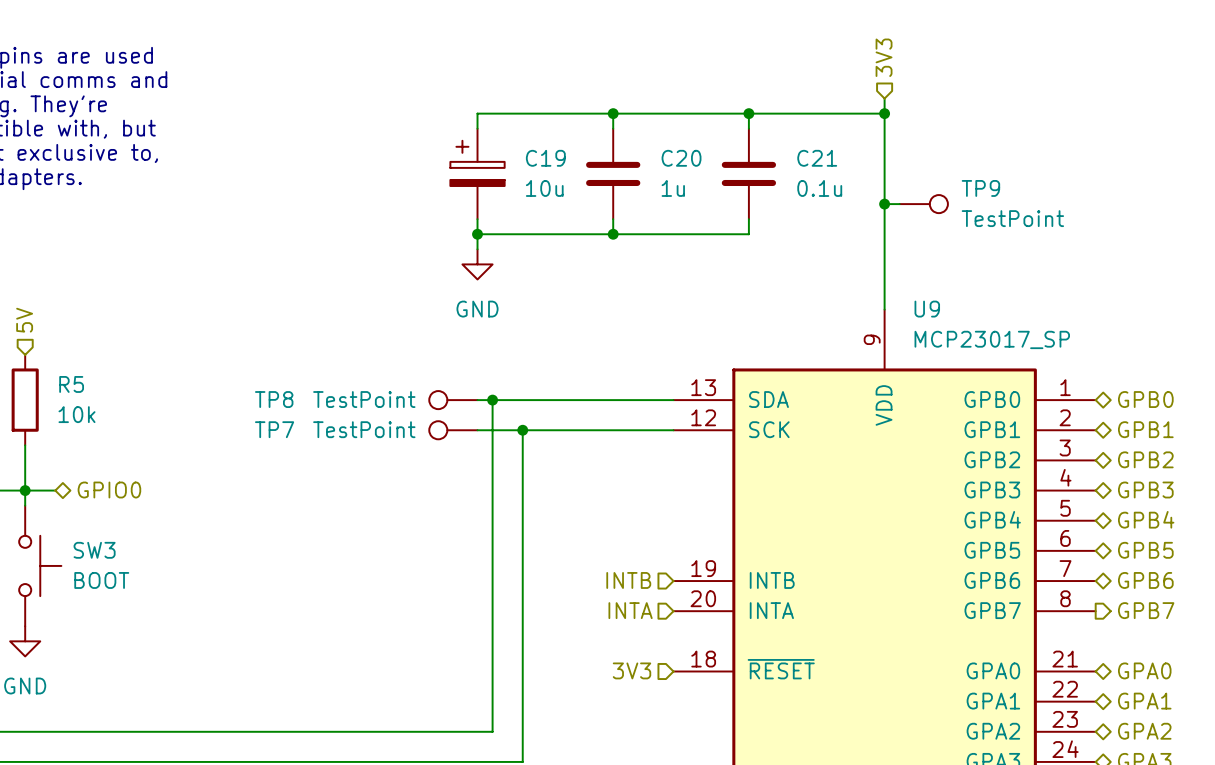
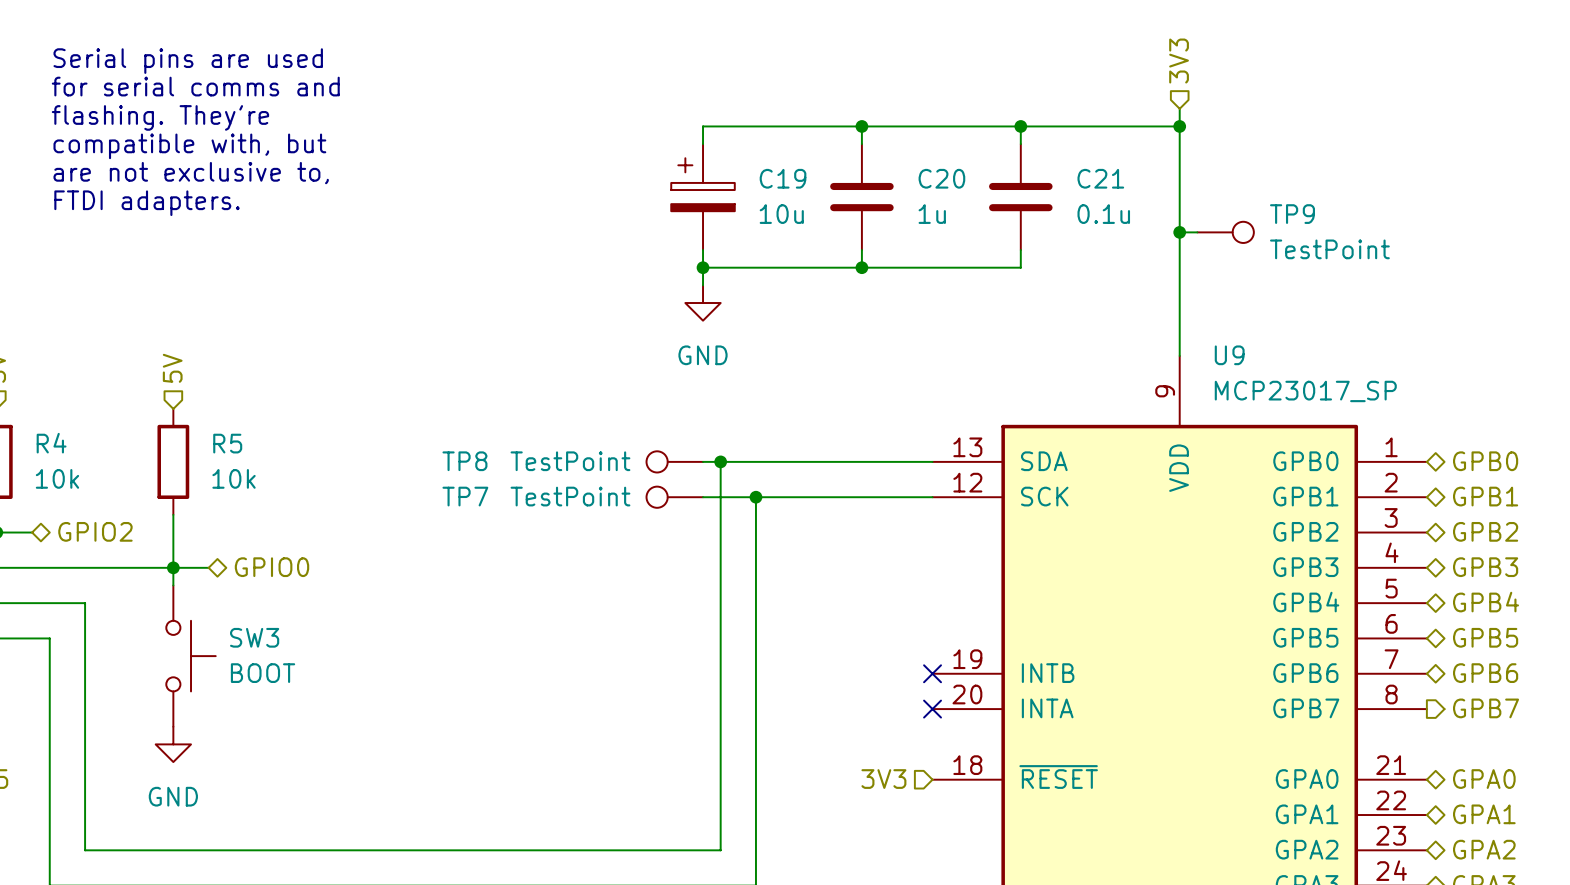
hierarchical label: INTB (628, 580) -> none
no-connect mark: none -> (932, 673)
hierarchical label: INTA (630, 610) -> none
no-connect mark: none -> (932, 709)

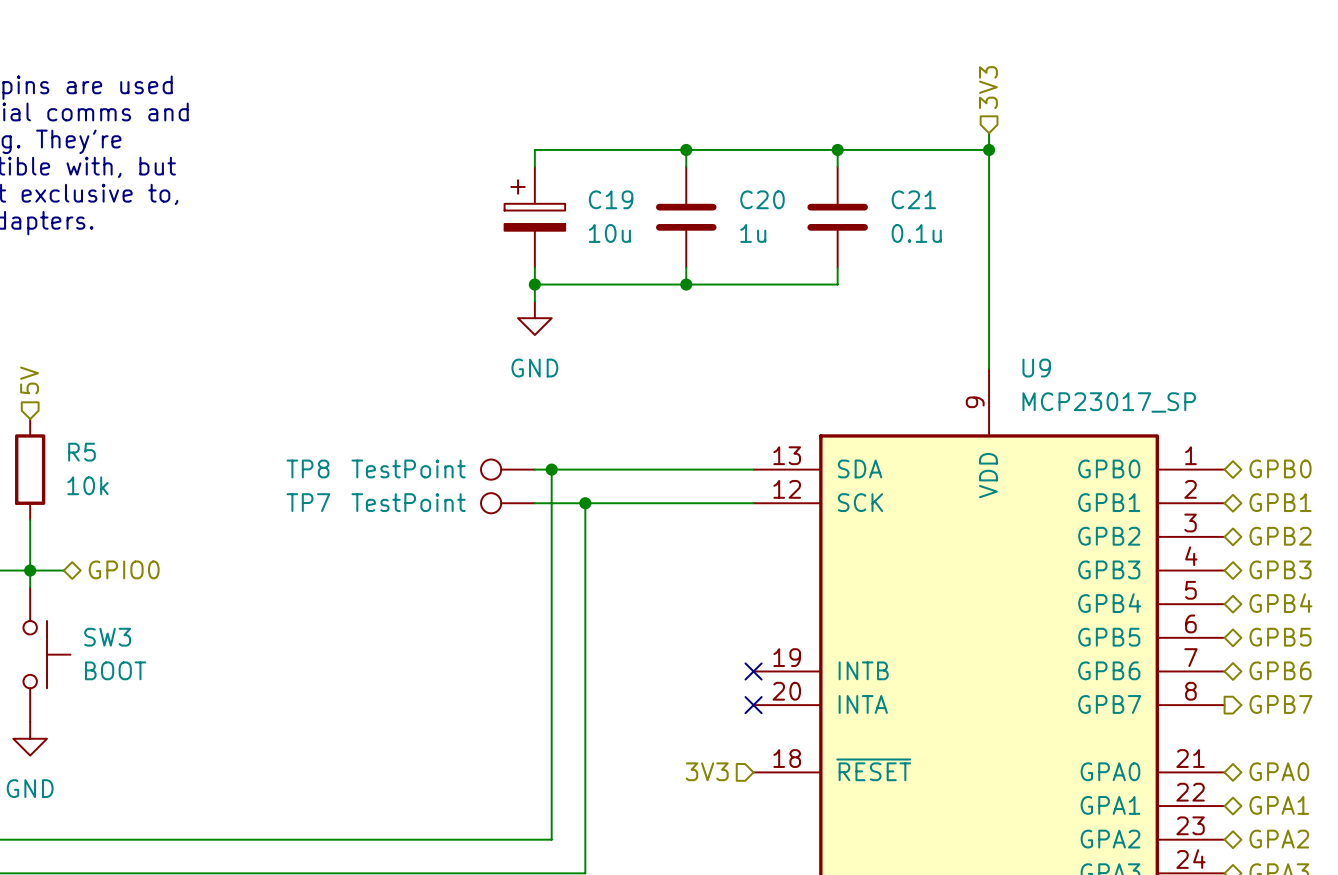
wire: (1179, 232) (1197, 232) -> none
junction: (1179, 232) -> none
TP9: TestPoint (1225, 232) -> none

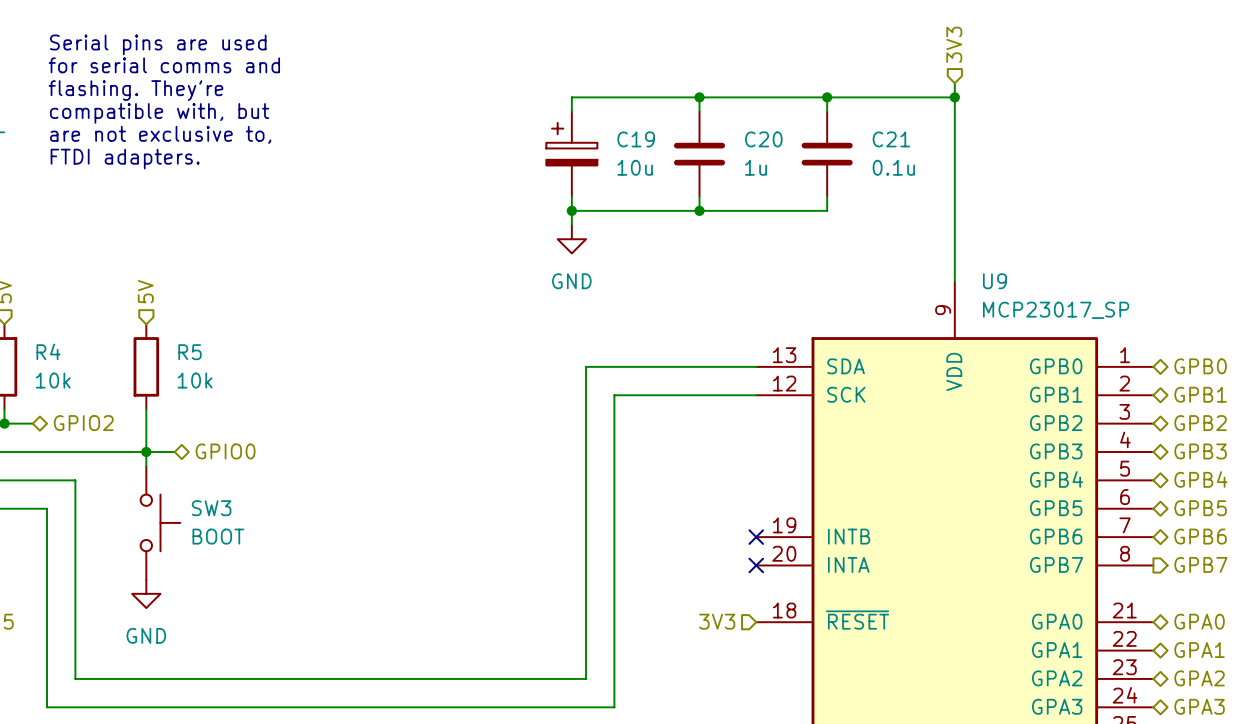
TP8: TestPoint (507, 469) -> none
wire: (534, 469) (551, 469) -> none
junction: (551, 469) -> none
TP7: TestPoint (507, 503) -> none
wire: (534, 503) (585, 503) -> none
junction: (585, 503) -> none

